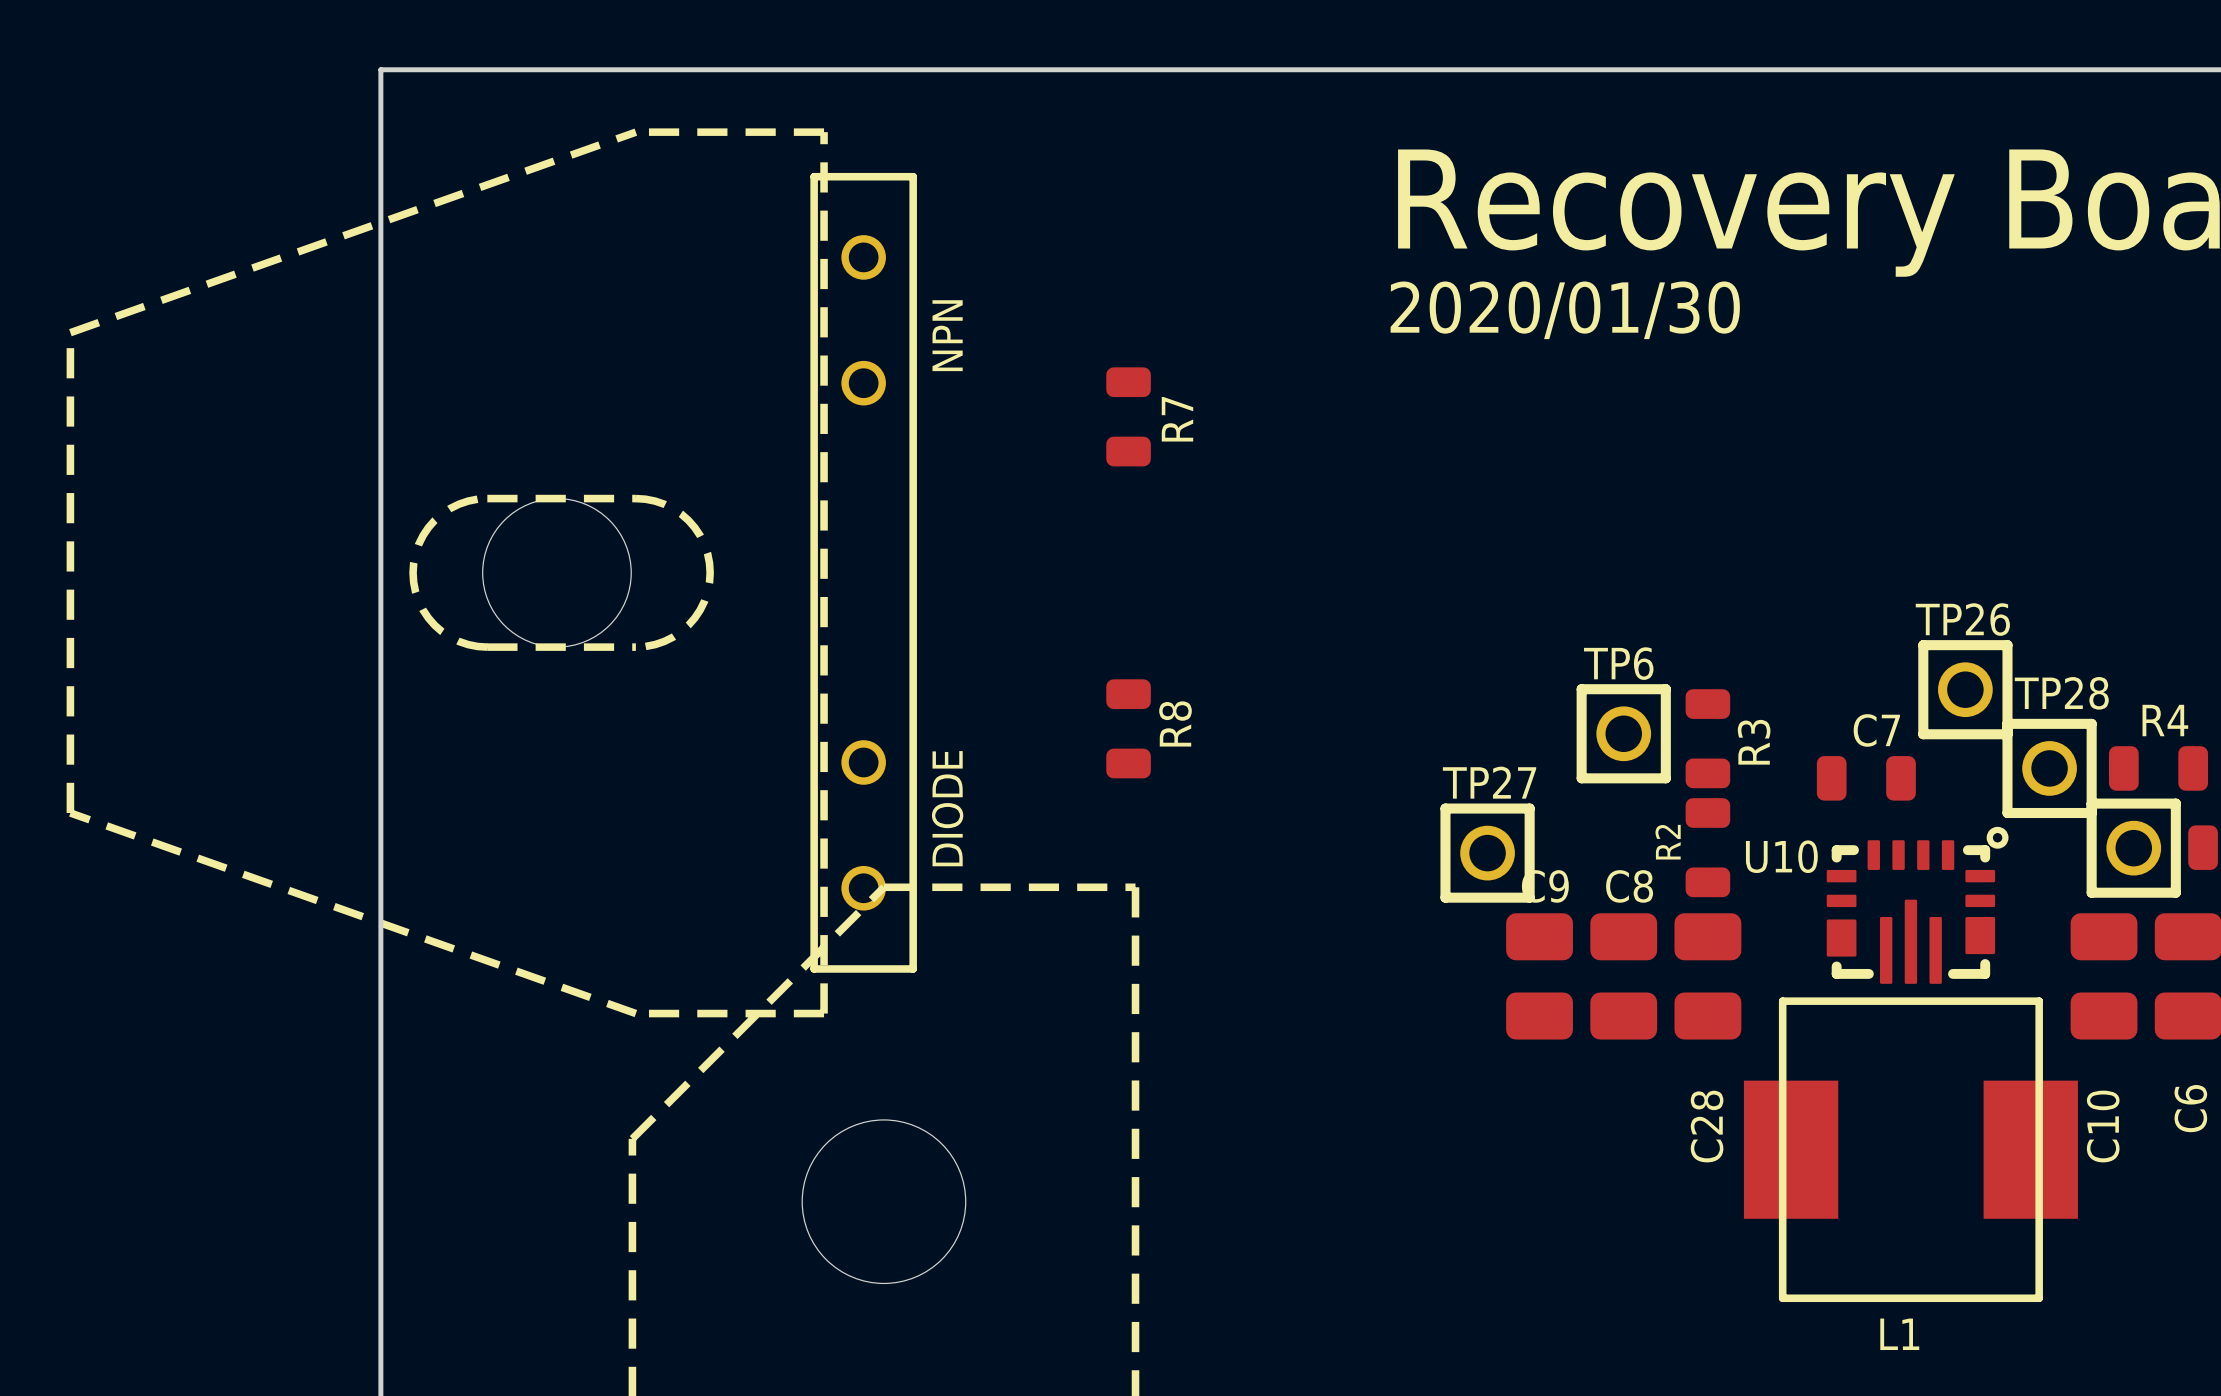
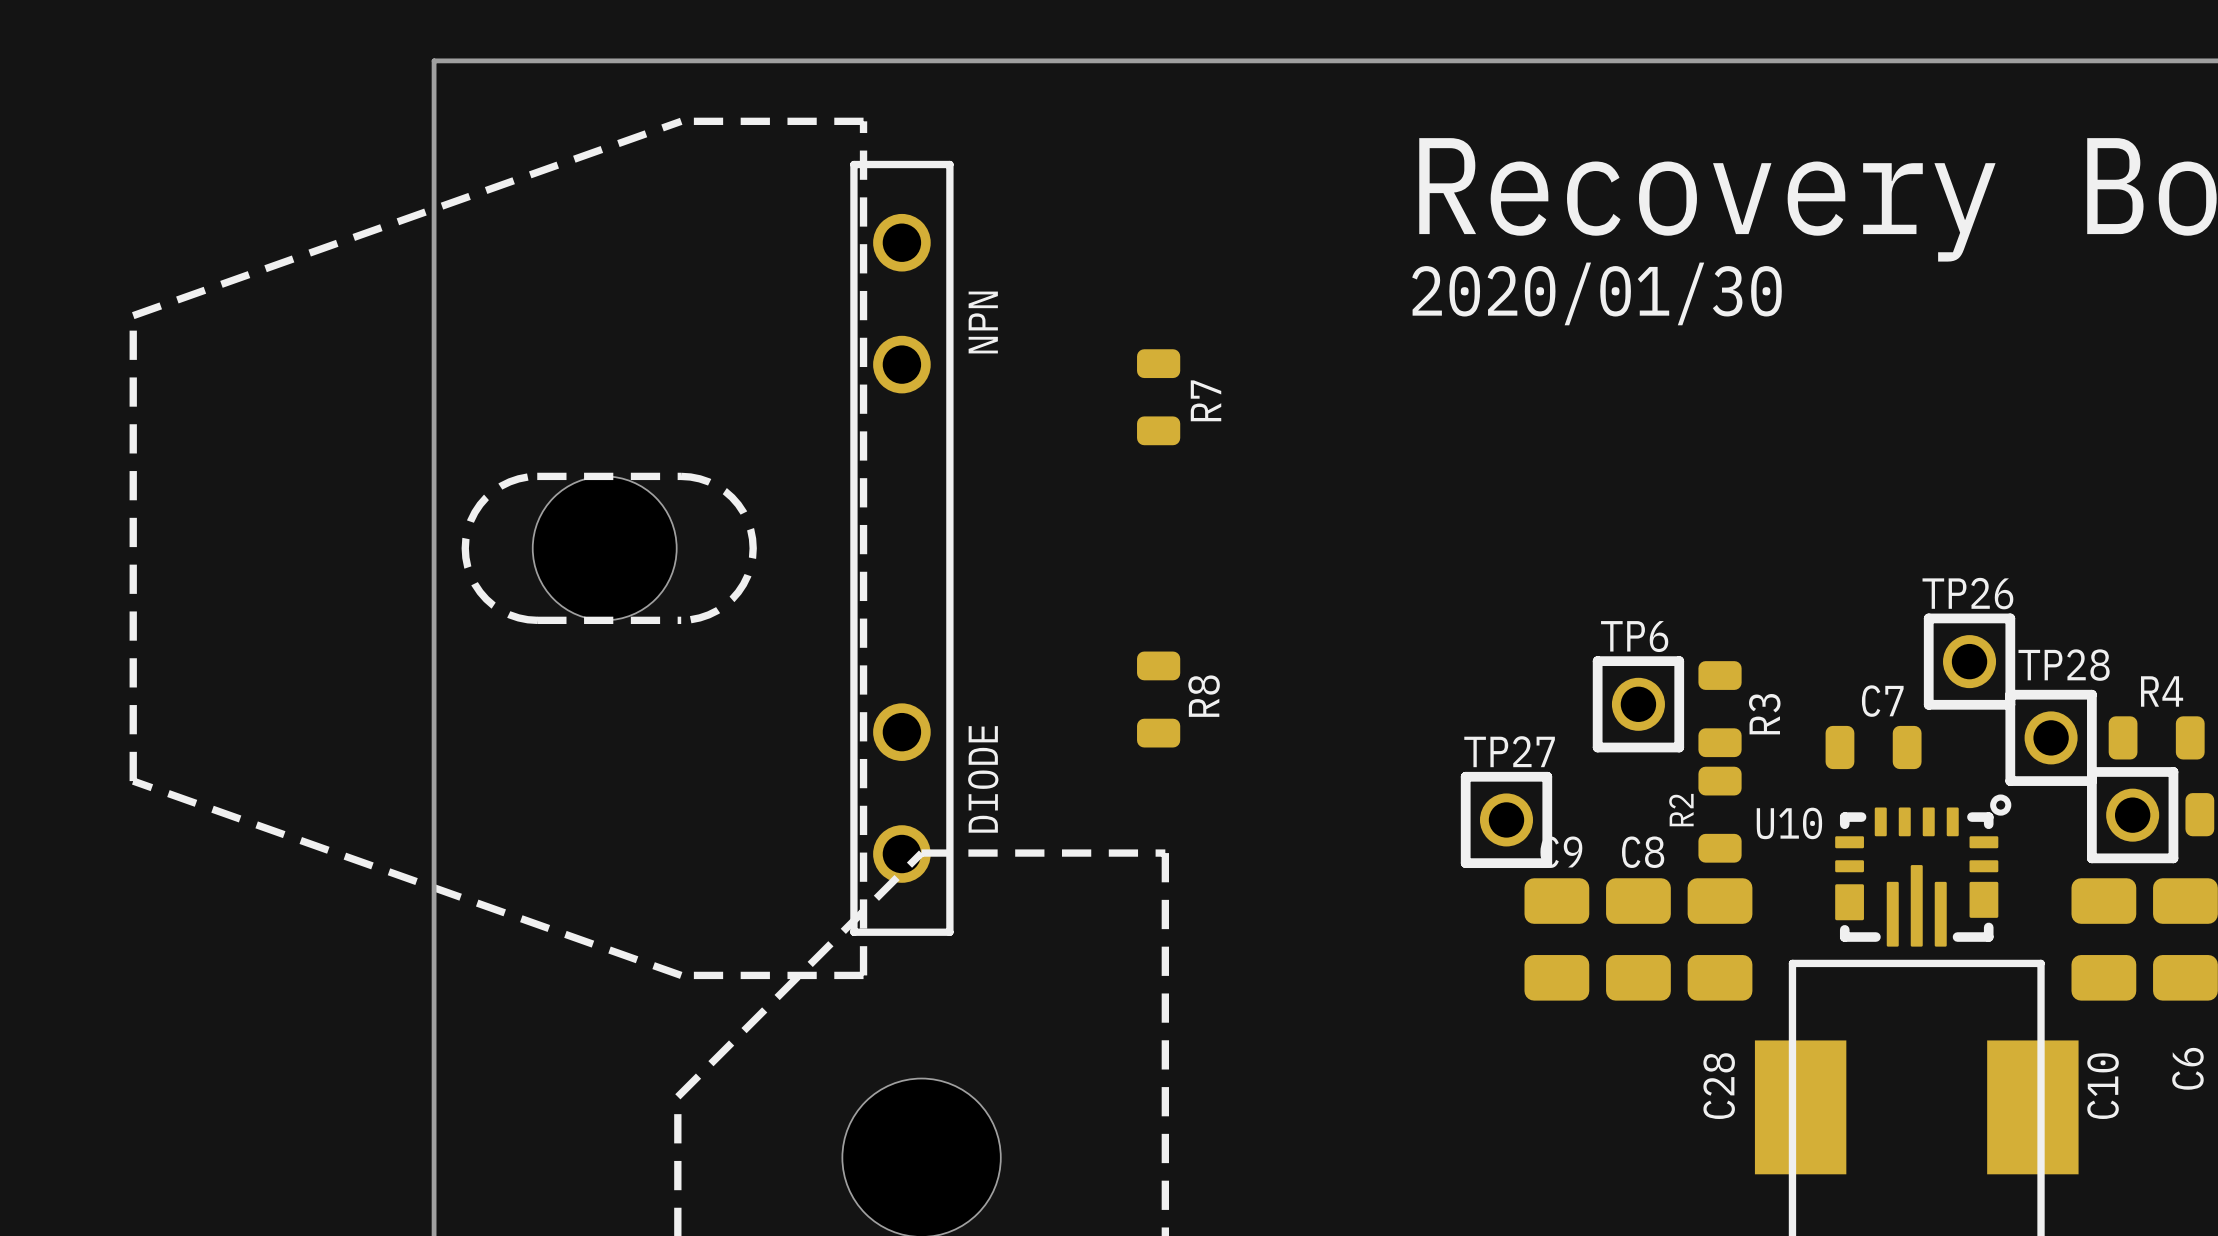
part footprint: [66, 128, 917, 1018] -> [129, 117, 954, 980]

